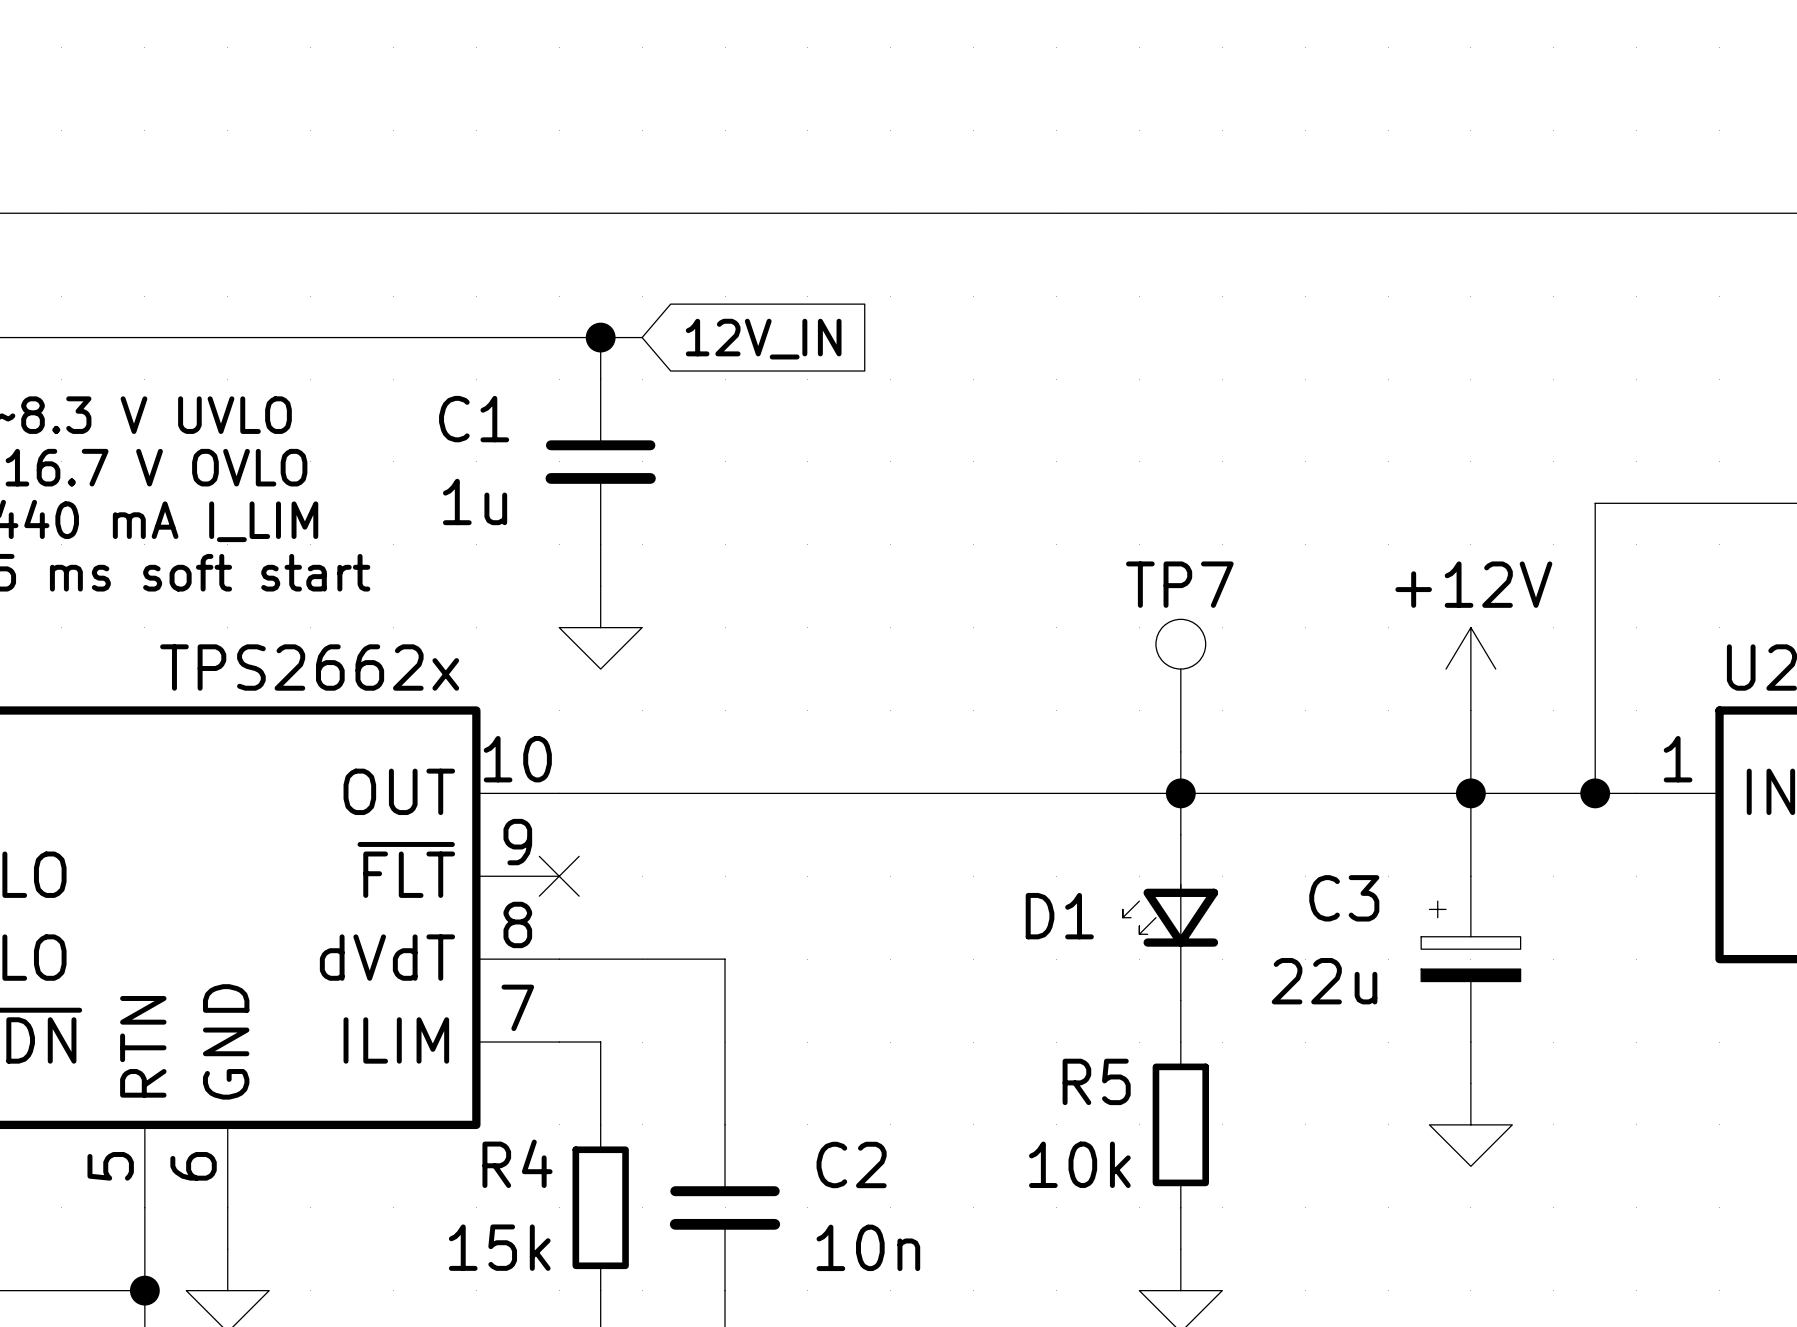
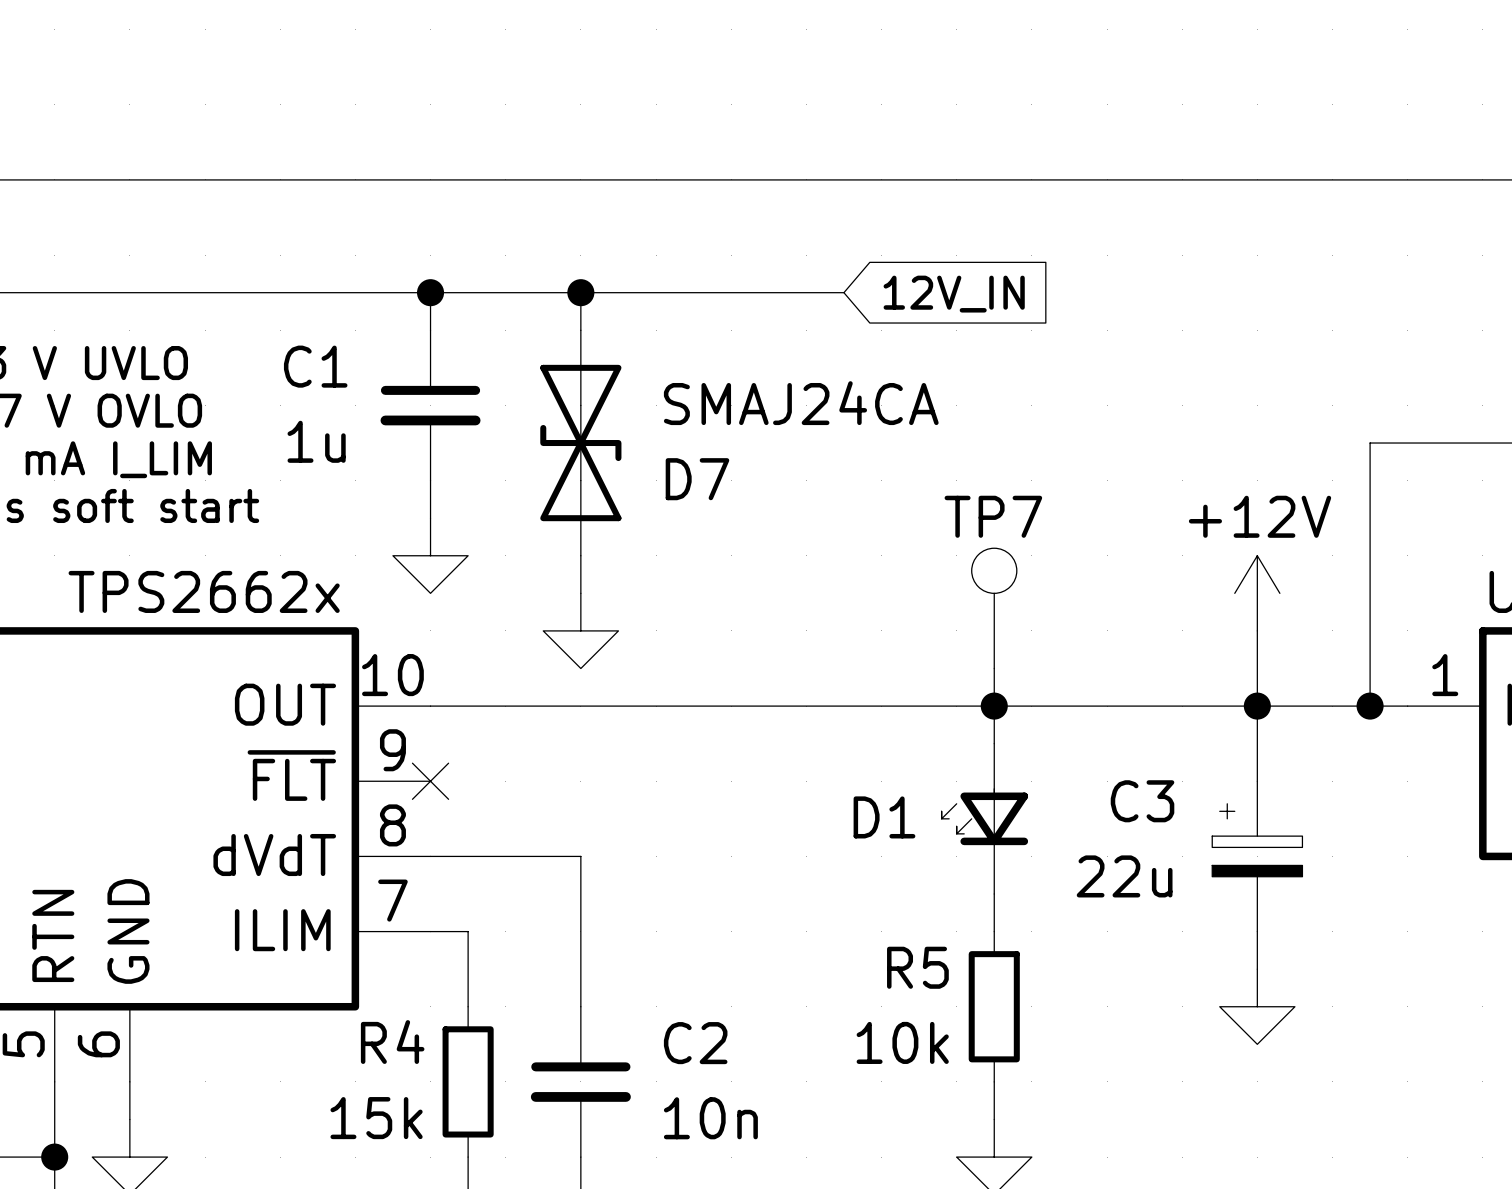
wire: (600, 337) (600, 379) -> (430, 292) (430, 330)
junction position: (600, 337) -> (430, 292)
wire: none -> (505, 292) (843, 292)
wire: none -> (580, 292) (580, 330)
junction: none -> (580, 292)
global label position: 12V_IN (763, 339) -> 12V_IN (954, 294)
C1 position: (600, 461) -> (430, 405)
D7: none -> SMAJ24CA (580, 443)
wire: (600, 544) (600, 586) -> (430, 480) (430, 518)
power symbol position: (600, 627) -> (430, 555)
wire: none -> (580, 555) (580, 593)
power symbol: none -> (580, 630)

